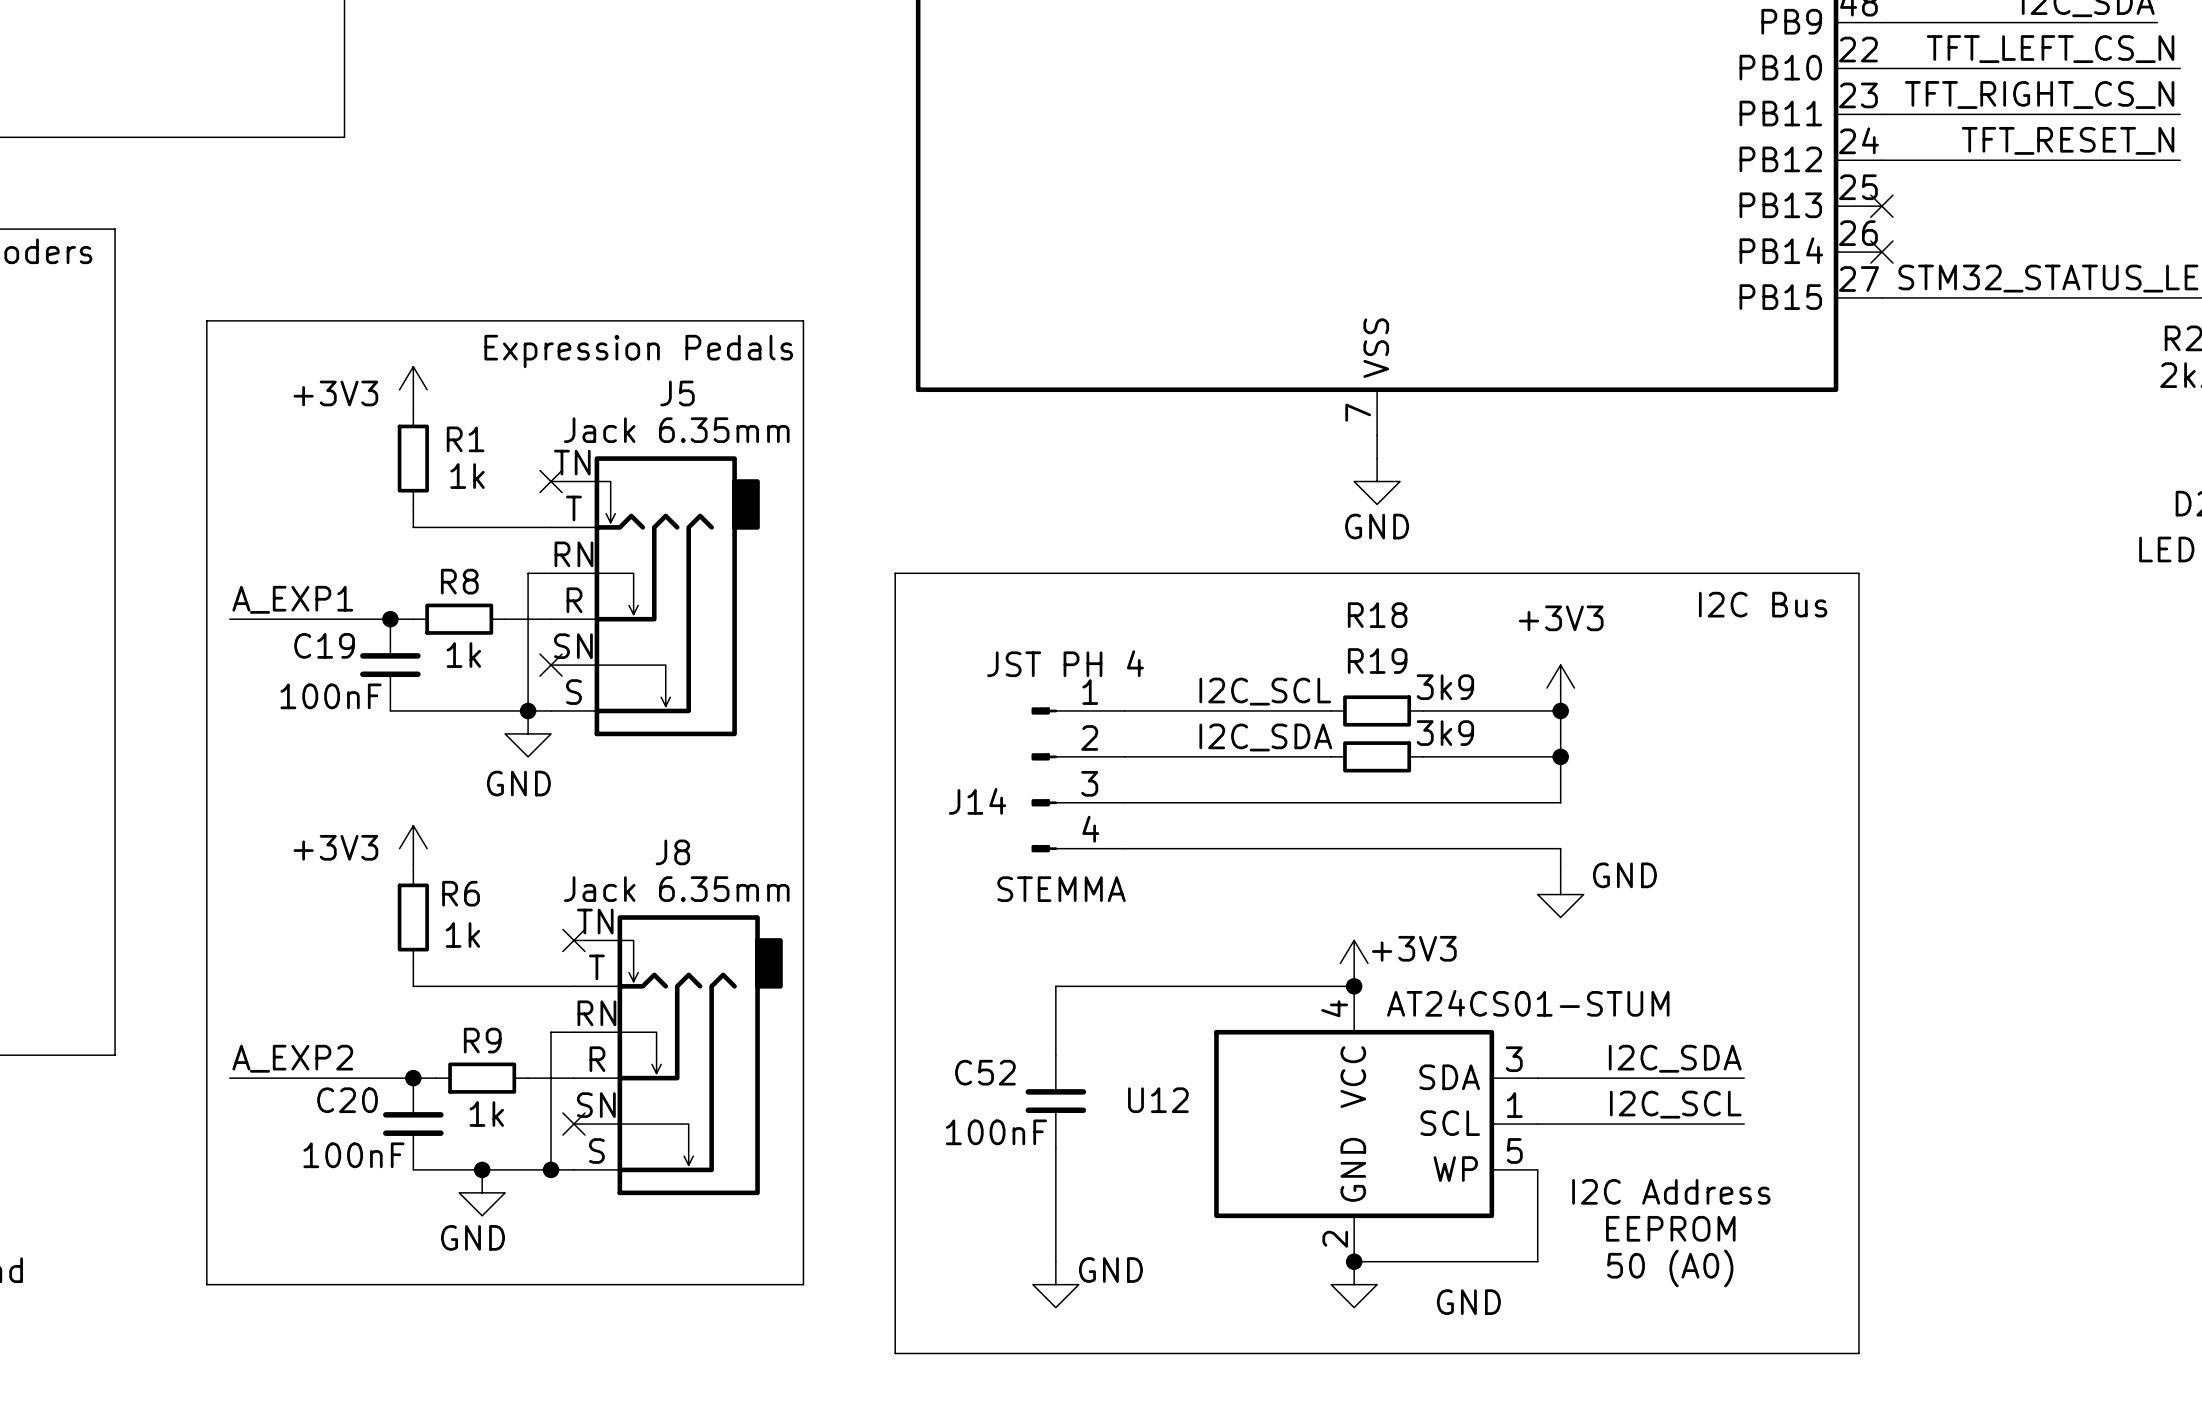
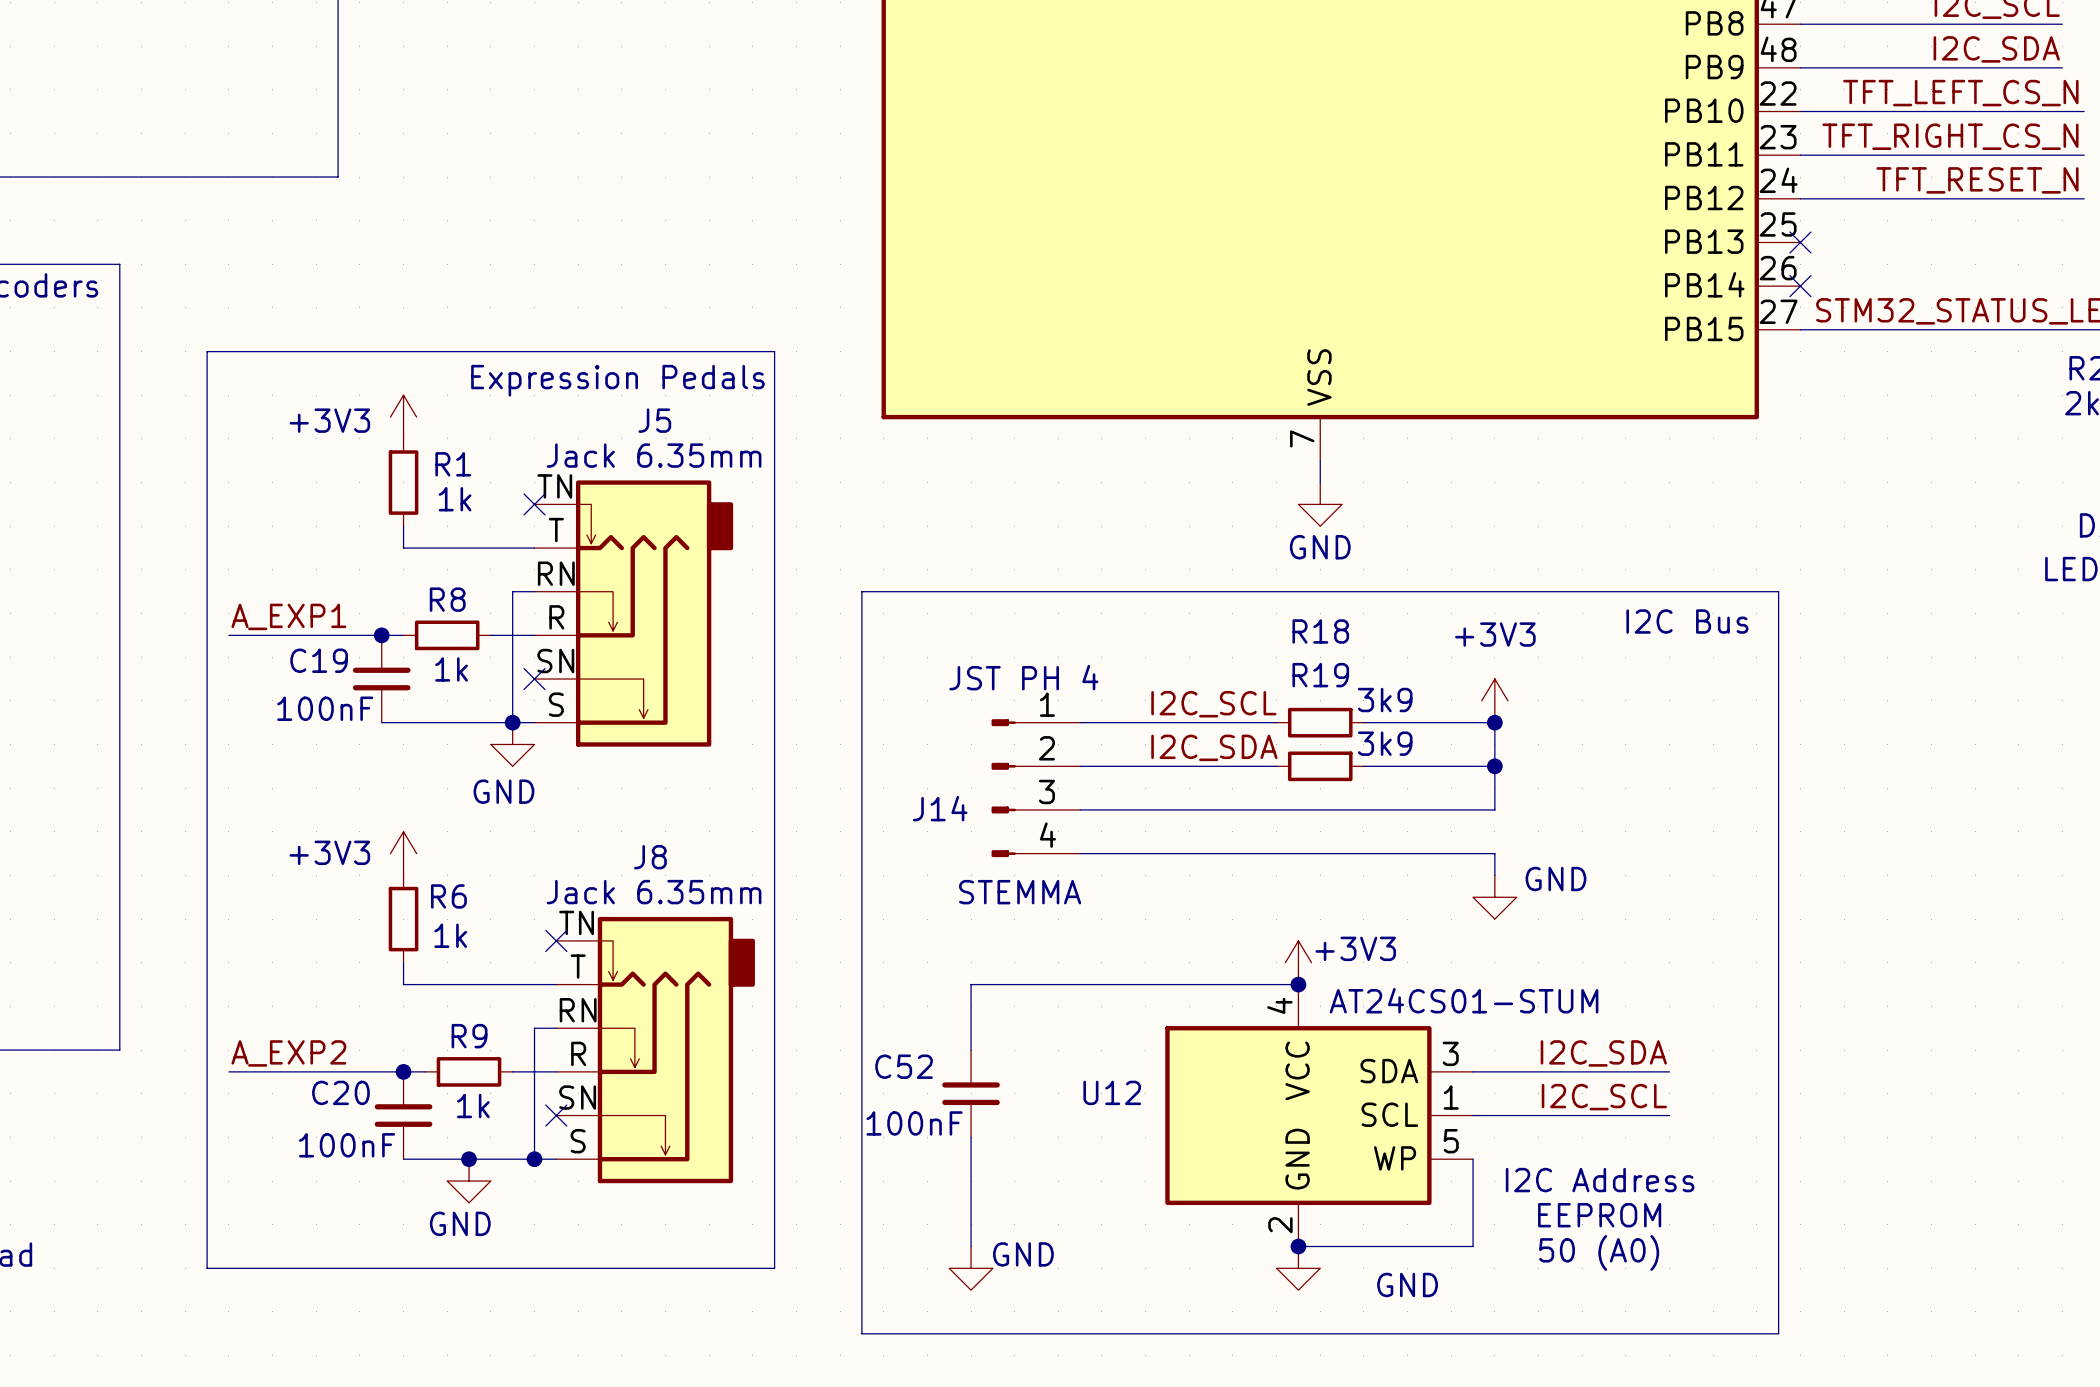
wire: (1055, 986) (1055, 1055) -> (1014, 984) (971, 984) (971, 1050)
C52 position: (1055, 1101) -> (971, 1093)
wire: (1055, 1146) (1055, 1261) -> (971, 1137) (971, 1246)
power symbol position: GND (1055, 1284) -> GND (971, 1268)

